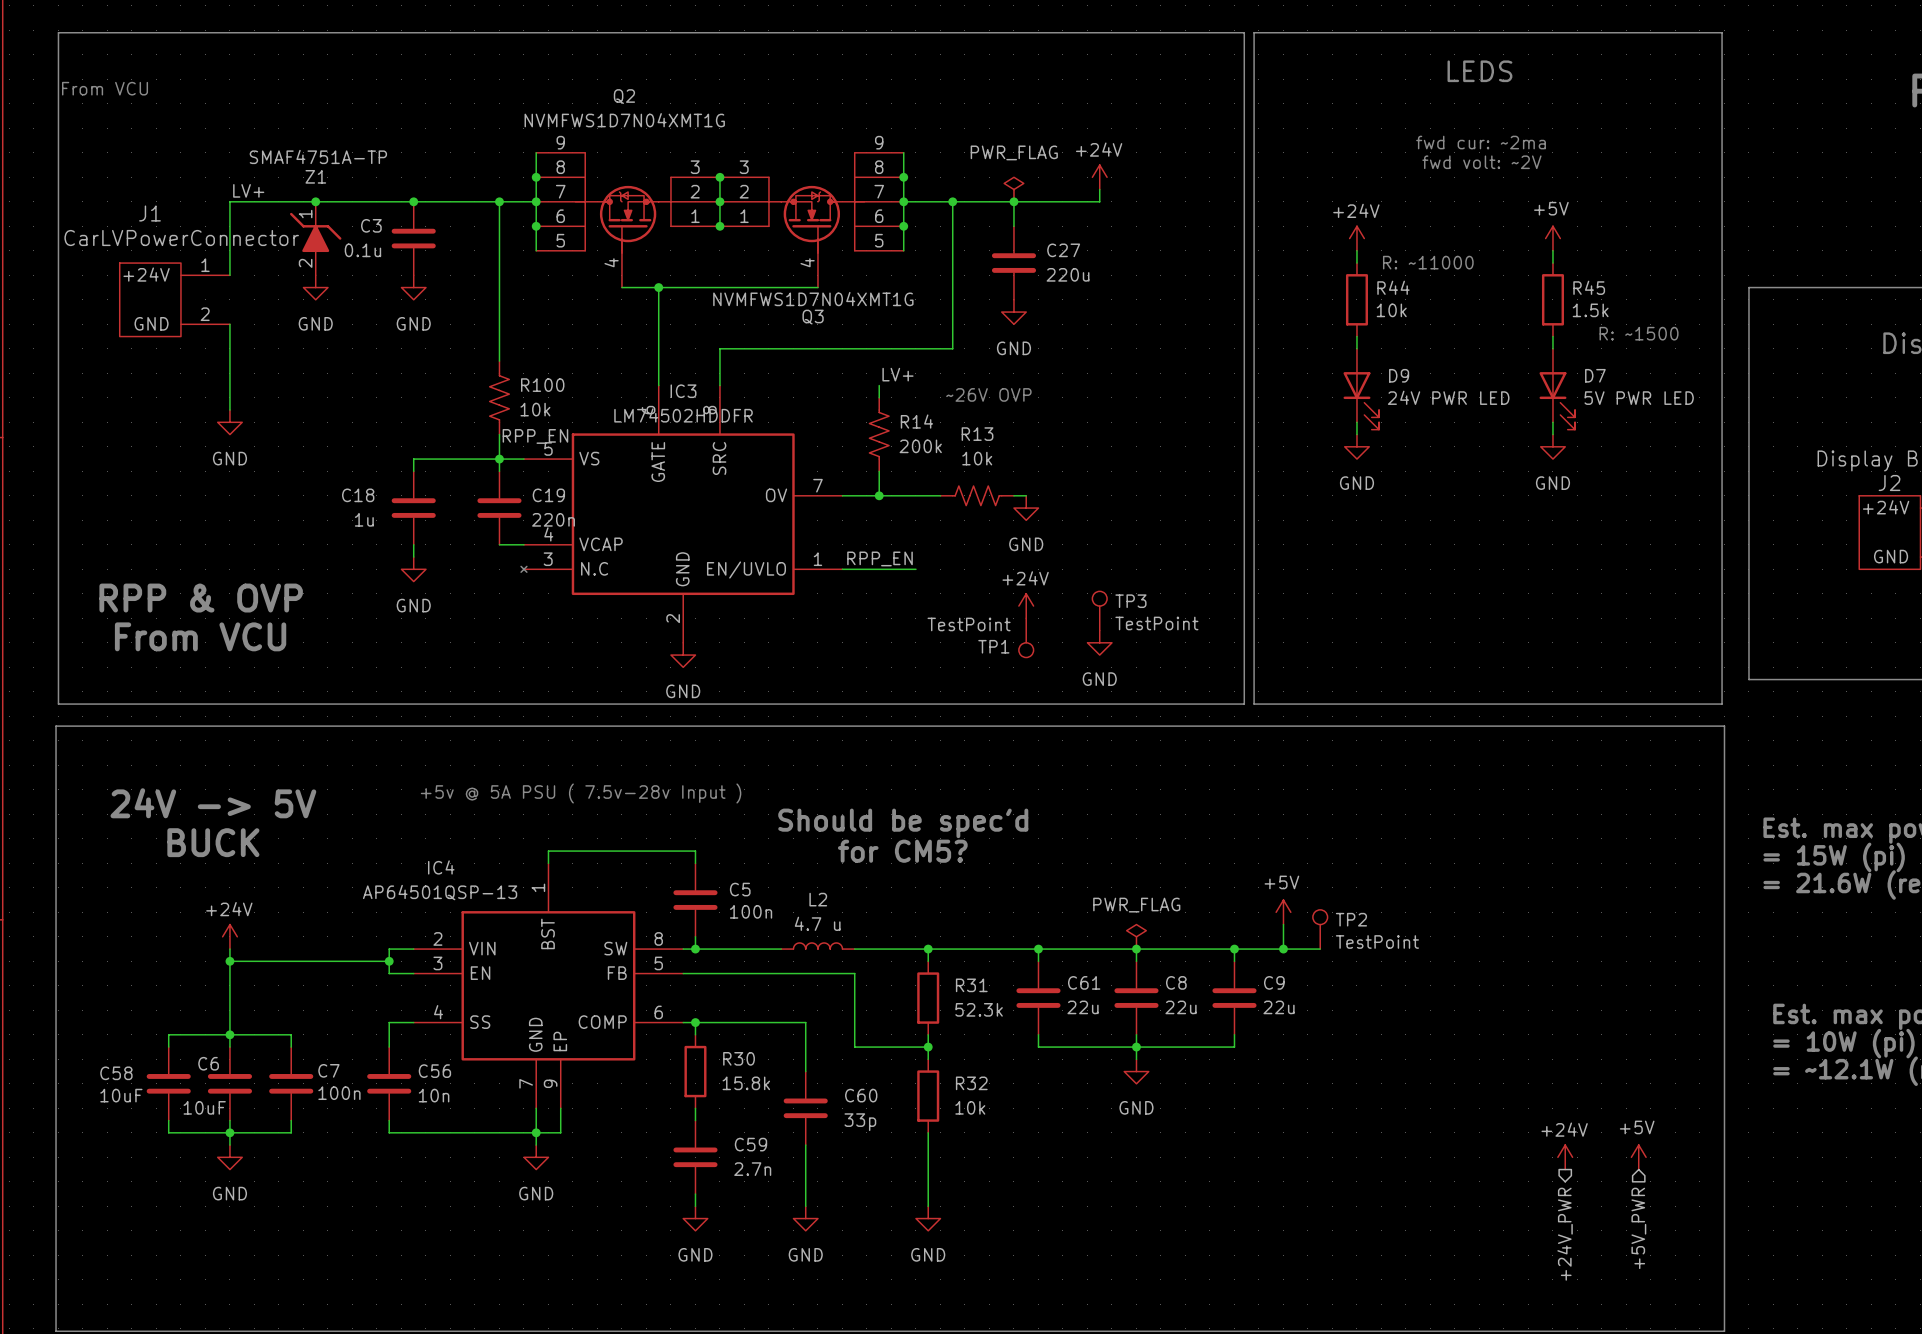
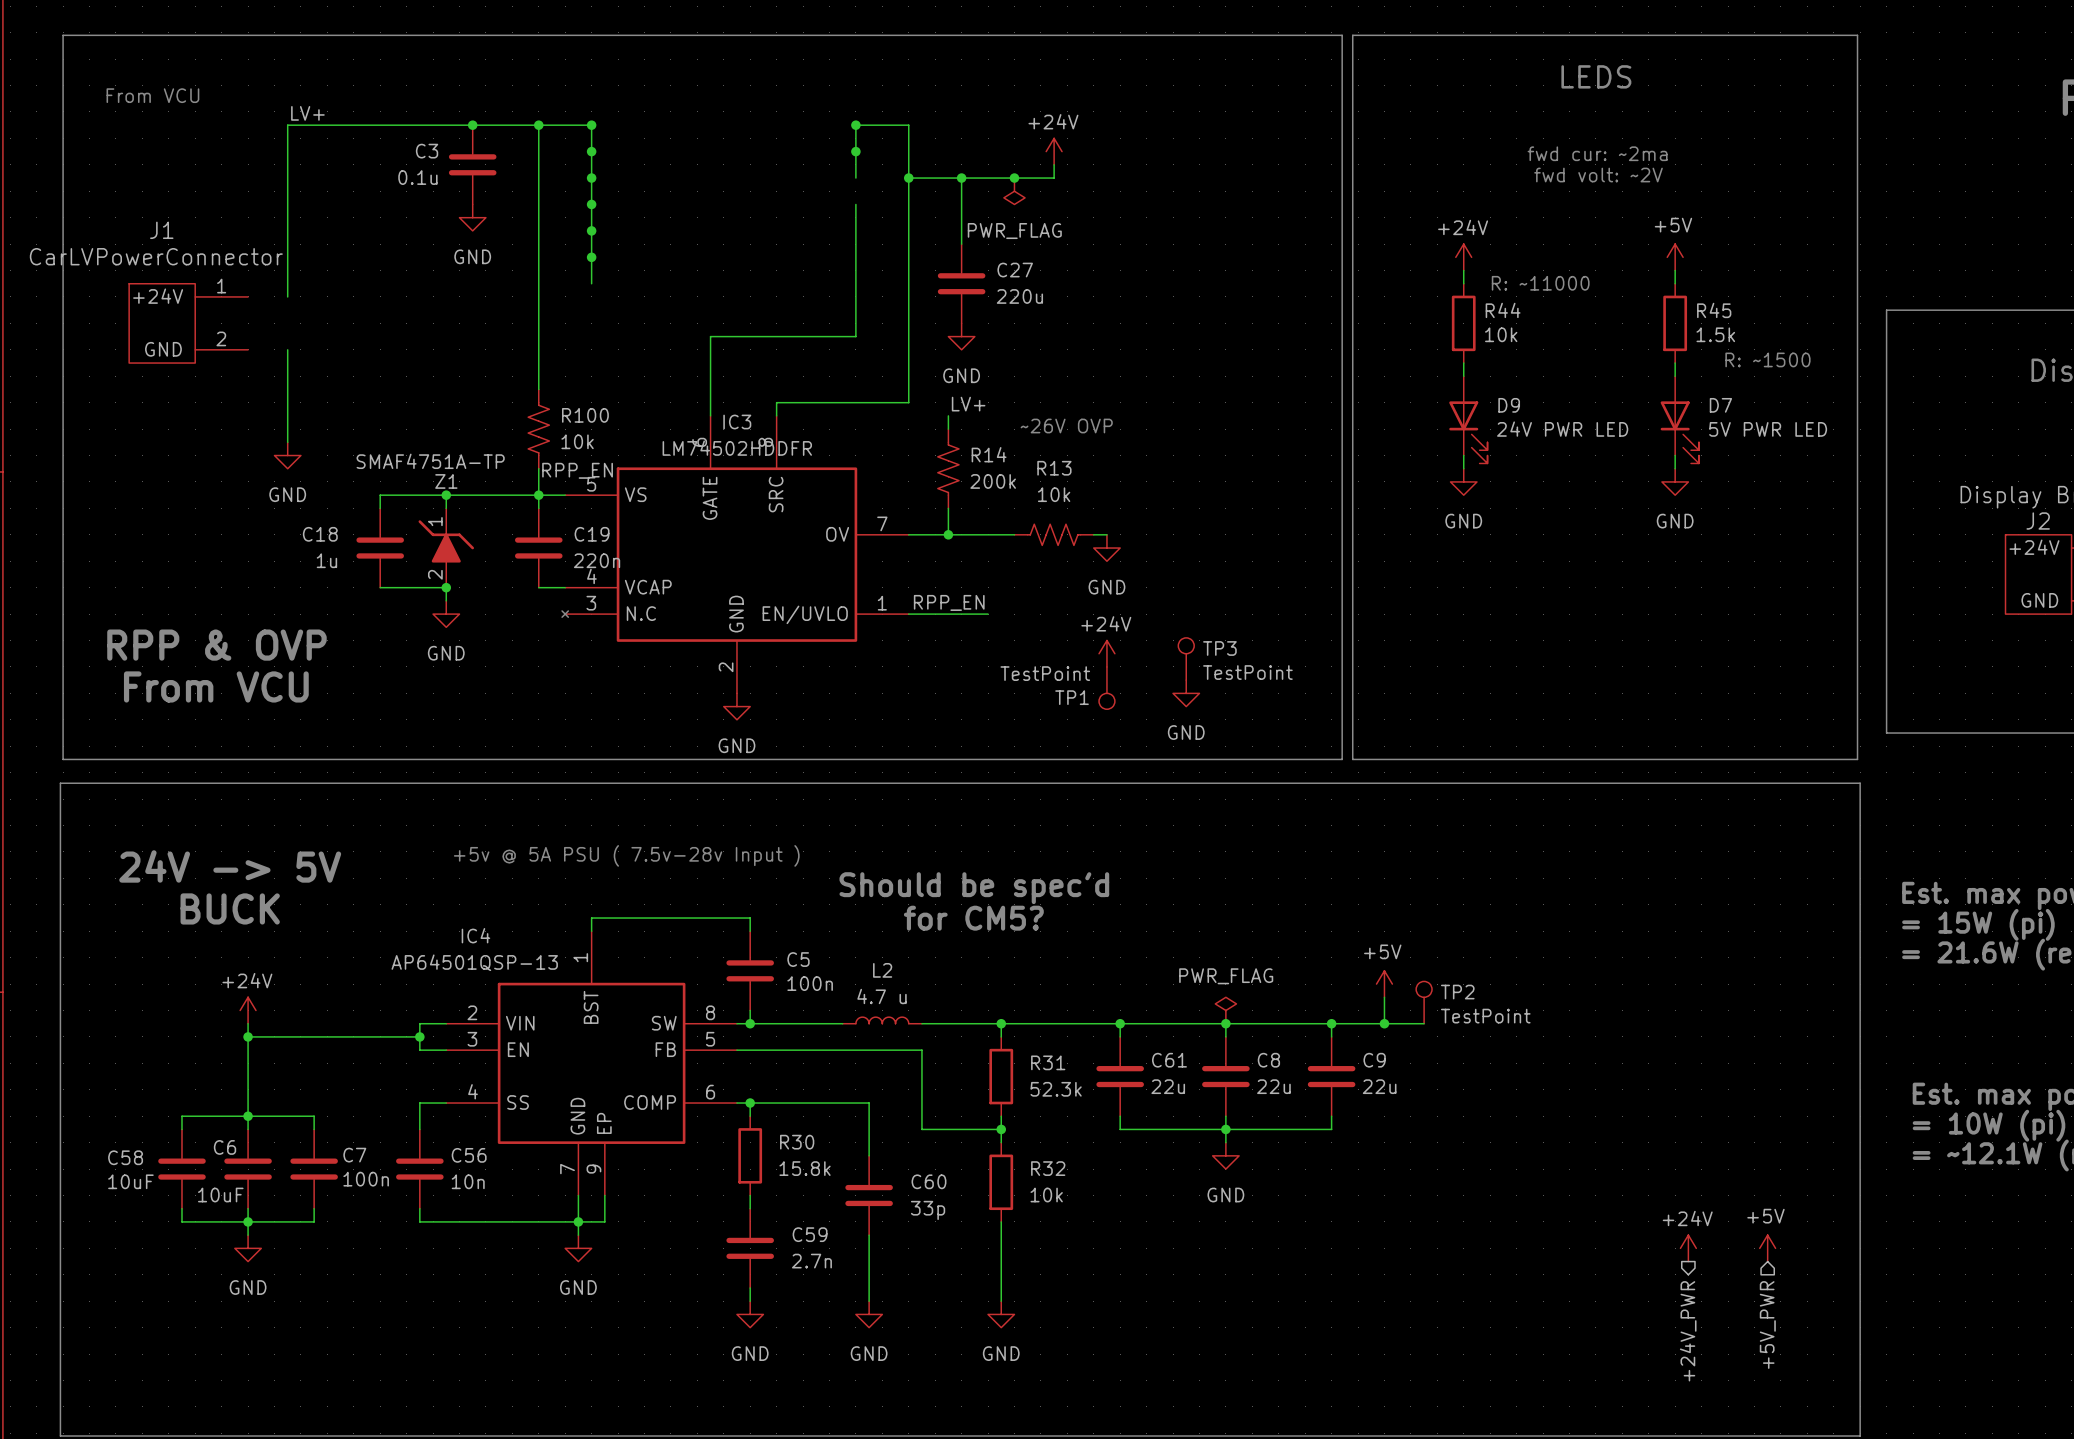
text position: From VCU (105, 88) -> From VCU (152, 95)
junction: none -> (472, 125)
wire: none -> (538, 125) (538, 217)
junction: none -> (538, 125)
junction: none -> (591, 125)
junction: none -> (855, 125)
junction: none -> (591, 151)
junction: none -> (855, 151)
wire: (536, 152) (536, 250) -> none
wire: (903, 152) (903, 250) -> none
wire: none -> (1054, 164) (1054, 178) (908, 178)
Z1 value position: SMAF4751A-TP (318, 156) -> SMAF4751A-TP (430, 461)
junction: none -> (591, 178)
junction: none -> (908, 178)
wire: none -> (961, 178) (961, 244)
junction: none -> (1014, 178)
junction: (536, 177) -> none
wire: (719, 177) (719, 226) -> none
junction: (719, 177) -> none
junction position: (903, 177) -> (961, 178)
power symbol position: +24V (1099, 177) -> +24V (1054, 151)
junction: none -> (591, 204)
power symbol rotation: 0° (1013, 189) -> 180° (1014, 191)
power symbol position: PWR_FLAG (1013, 189) -> PWR_FLAG (1014, 191)
wire: (1099, 189) (1099, 201) (903, 201) -> none
label position: LV+ (248, 190) -> LV+ (307, 113)
junction: (315, 201) -> none
junction: (413, 201) -> none
power symbol: none -> GND (472, 217)
junction: (499, 201) -> none
wire: (536, 201) (229, 201) (229, 275) -> none
junction: (536, 201) -> none
junction: (719, 201) -> none
junction: (903, 201) -> none
wire: (952, 201) (952, 348) (719, 348) (719, 373) -> (855, 178) (855, 125) (908, 125) (908, 402) (776, 402)
junction: (952, 201) -> none
wire: (1013, 201) (1013, 226) -> none
junction: (1013, 201) -> none
junction: none -> (591, 230)
Q2: NVMFWS1D7N04XMT1G (628, 220) -> none
Q3: NVMFWS1D7N04XMT1G (811, 220) -> none
junction: (536, 226) -> none
junction: (719, 226) -> none
junction: (903, 226) -> none
J1 value position: CarLVPowerConnector (181, 238) -> CarLVPowerConnector (156, 256)
Z1 position: (315, 238) -> (446, 548)
C3 position: (413, 238) -> (472, 164)
junction: none -> (591, 257)
wire: none -> (591, 283) (591, 125) (287, 125) (287, 296)
C27 position: (1013, 263) -> (961, 283)
power symbol: GND (315, 287) -> none
power symbol: GND (413, 287) -> none
wire: (621, 287) (817, 287) -> none
wire: (658, 287) (658, 312) -> (855, 204) (855, 336) (710, 336)
junction: (658, 287) -> none
power symbol position: GND (1013, 312) -> GND (961, 336)
wire: (229, 324) (229, 410) -> (287, 349) (287, 442)
power symbol position: GND (229, 422) -> GND (287, 455)
wire: none -> (446, 495) (380, 495) (380, 508)
junction: none -> (446, 495)
C18 position: (413, 508) -> (380, 548)
wire: none -> (380, 587) (446, 587)
junction: none -> (446, 587)

